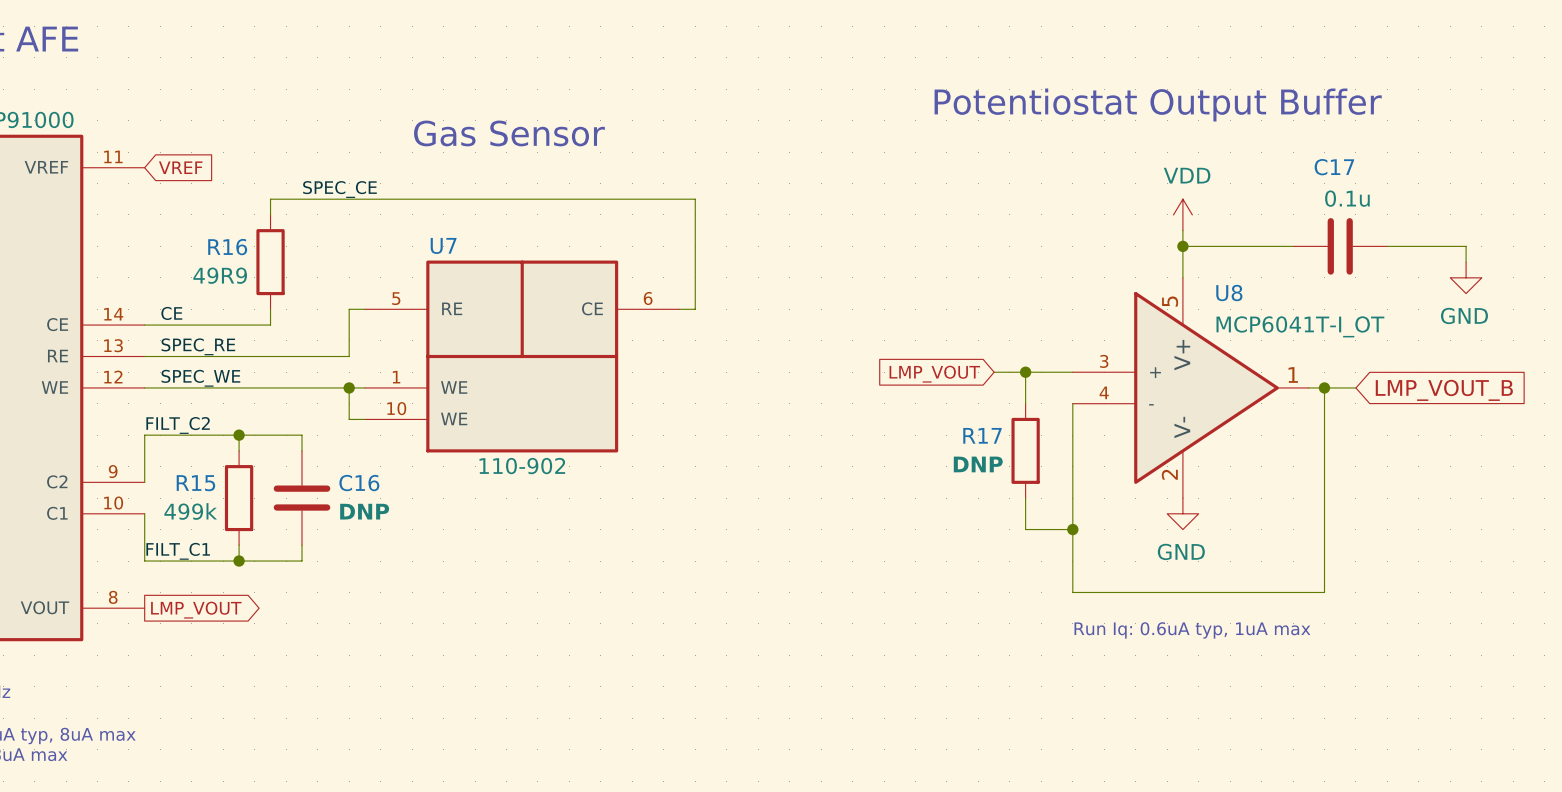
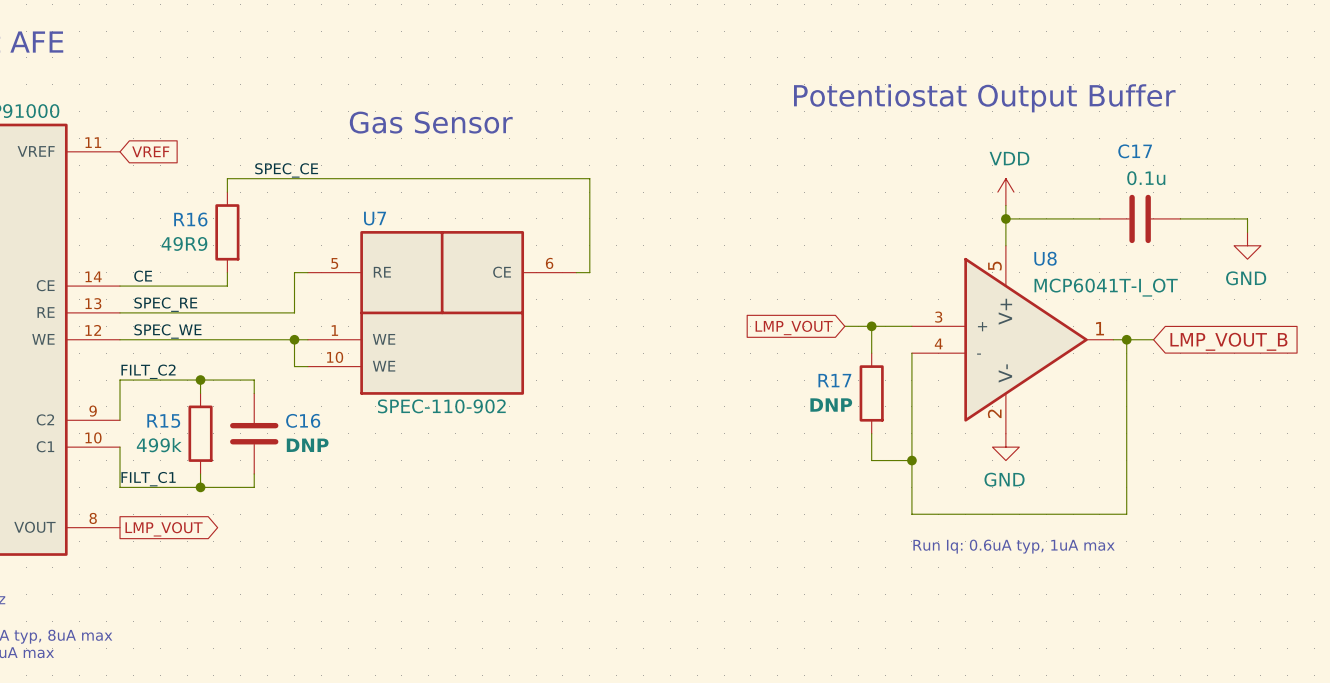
U7 value: 110-902 (522, 466) -> SPEC-110-902 (441, 406)

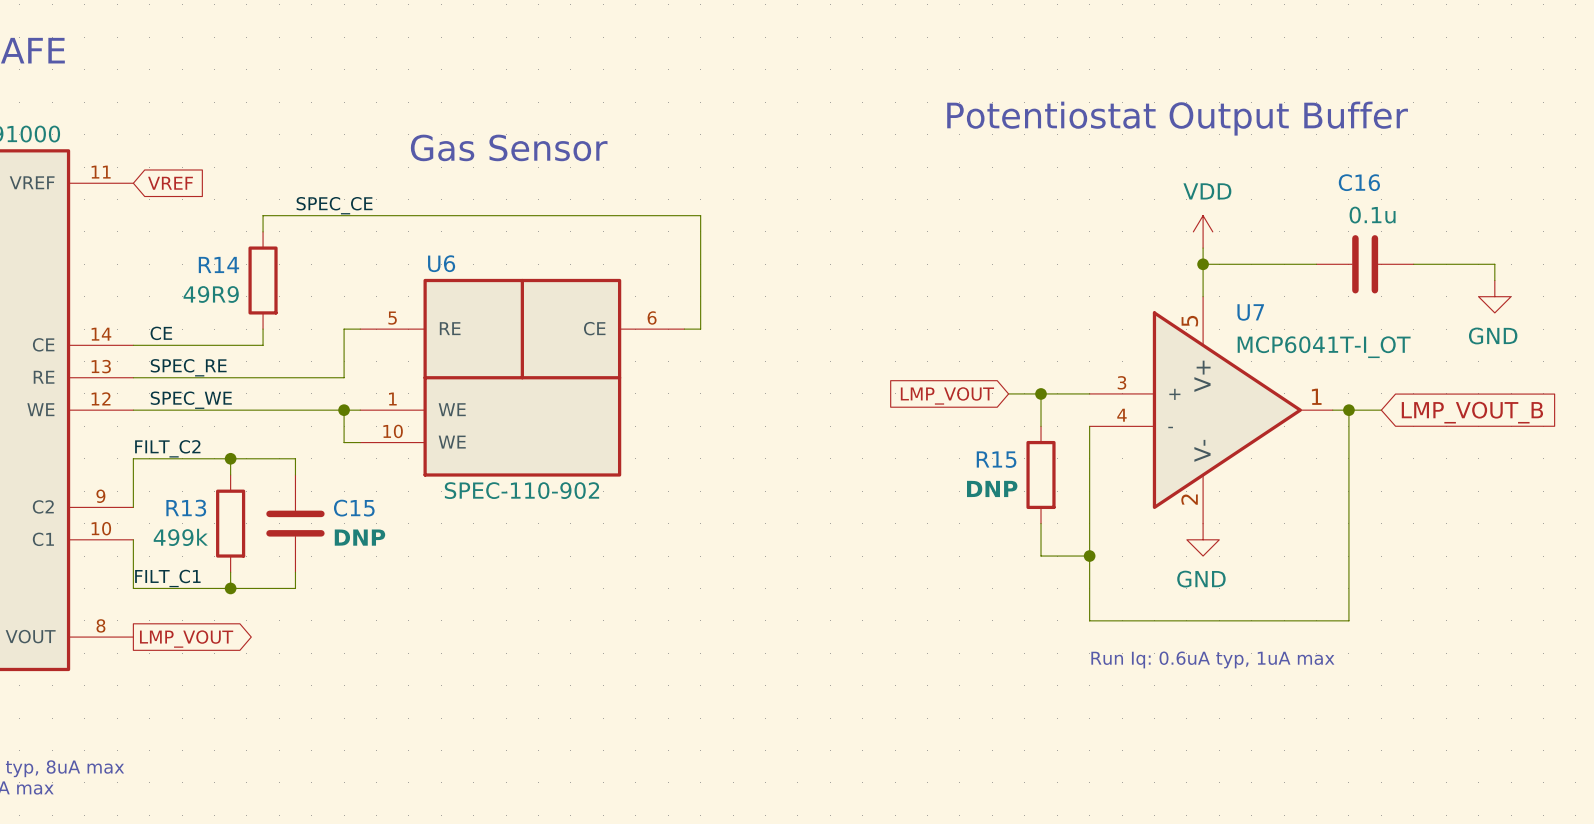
C17 name: C17 (1135, 151) -> C16 (1359, 182)
U7 name: U7 (375, 218) -> U6 (441, 263)
R16 name: R16 (190, 219) -> R14 (218, 264)
U8 name: U8 (1045, 258) -> U7 (1250, 312)
R17 name: R17 (834, 380) -> R15 (996, 459)
R15 name: R15 (163, 420) -> R13 (186, 508)
C16 name: C16 (303, 420) -> C15 (354, 508)

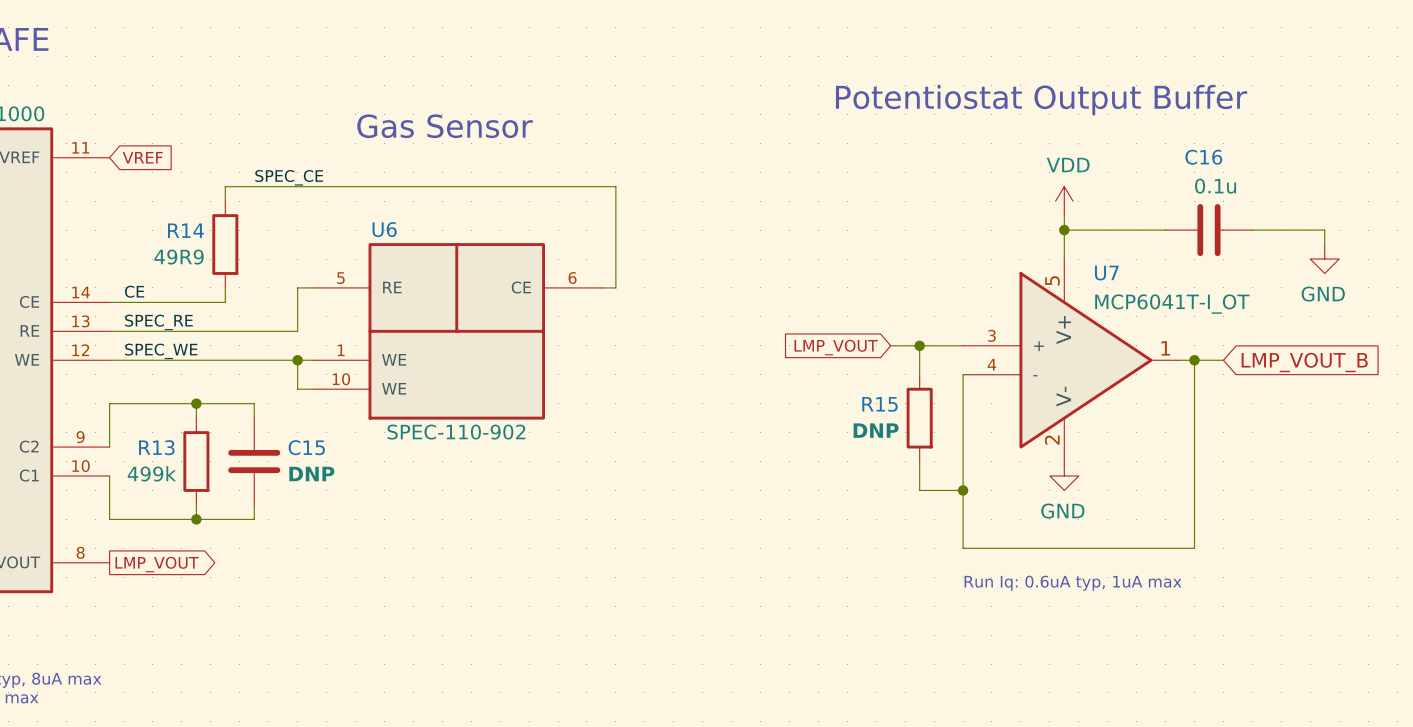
label: FILT_C2 (167, 448) -> none
label: FILT_C1 (167, 578) -> none

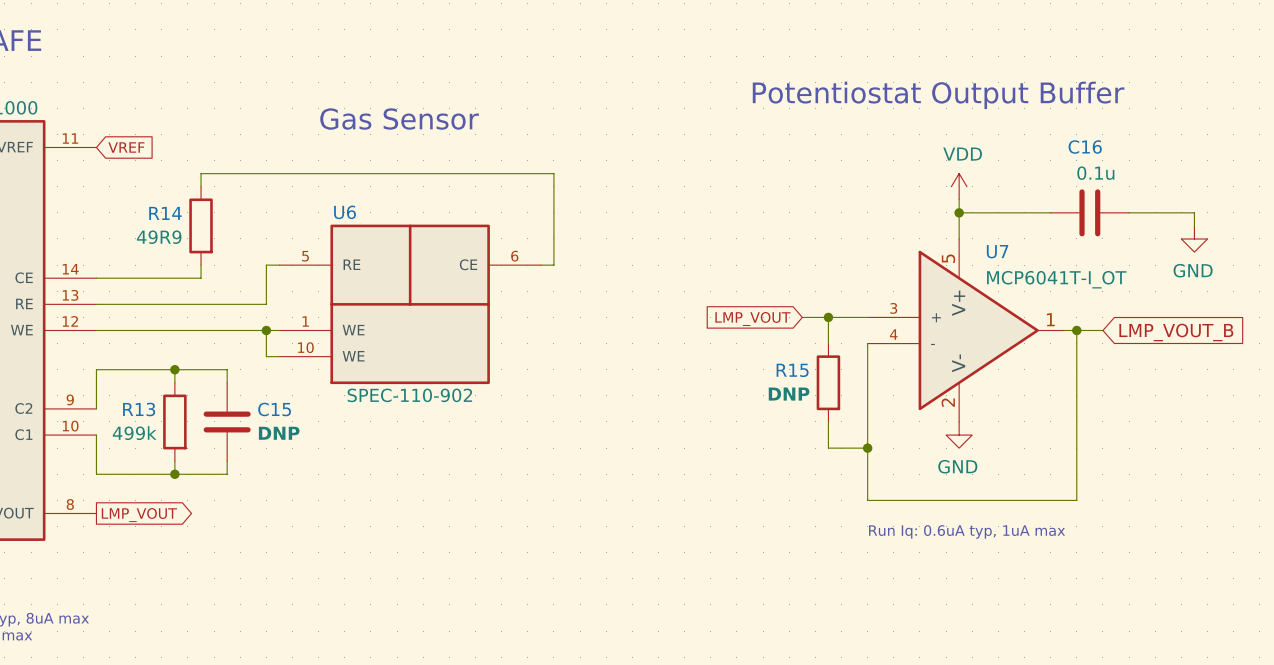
label: SPEC_CE (289, 177) -> none
label: CE (134, 291) -> none
label: SPEC_RE (158, 322) -> none
label: SPEC_WE (161, 351) -> none

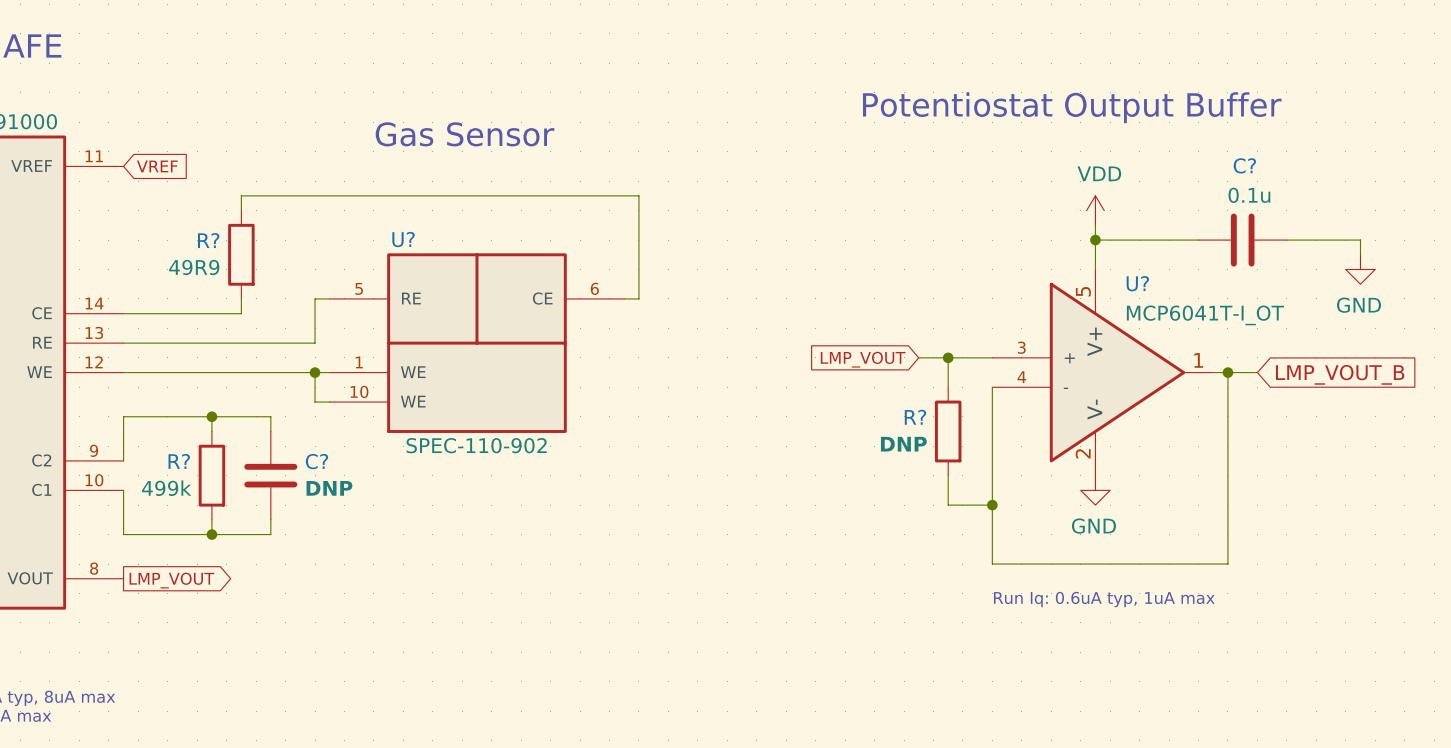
C16 name: C16 (1085, 147) -> C? (1244, 165)
U6 name: U6 (345, 212) -> U? (403, 239)
R14 name: R14 (165, 213) -> R? (208, 240)
U7 name: U7 (997, 251) -> U? (1137, 283)
R15 name: R15 (792, 370) -> R? (915, 417)
R13 name: R13 (139, 409) -> R? (179, 461)
C15 name: C15 (274, 409) -> C? (316, 461)

